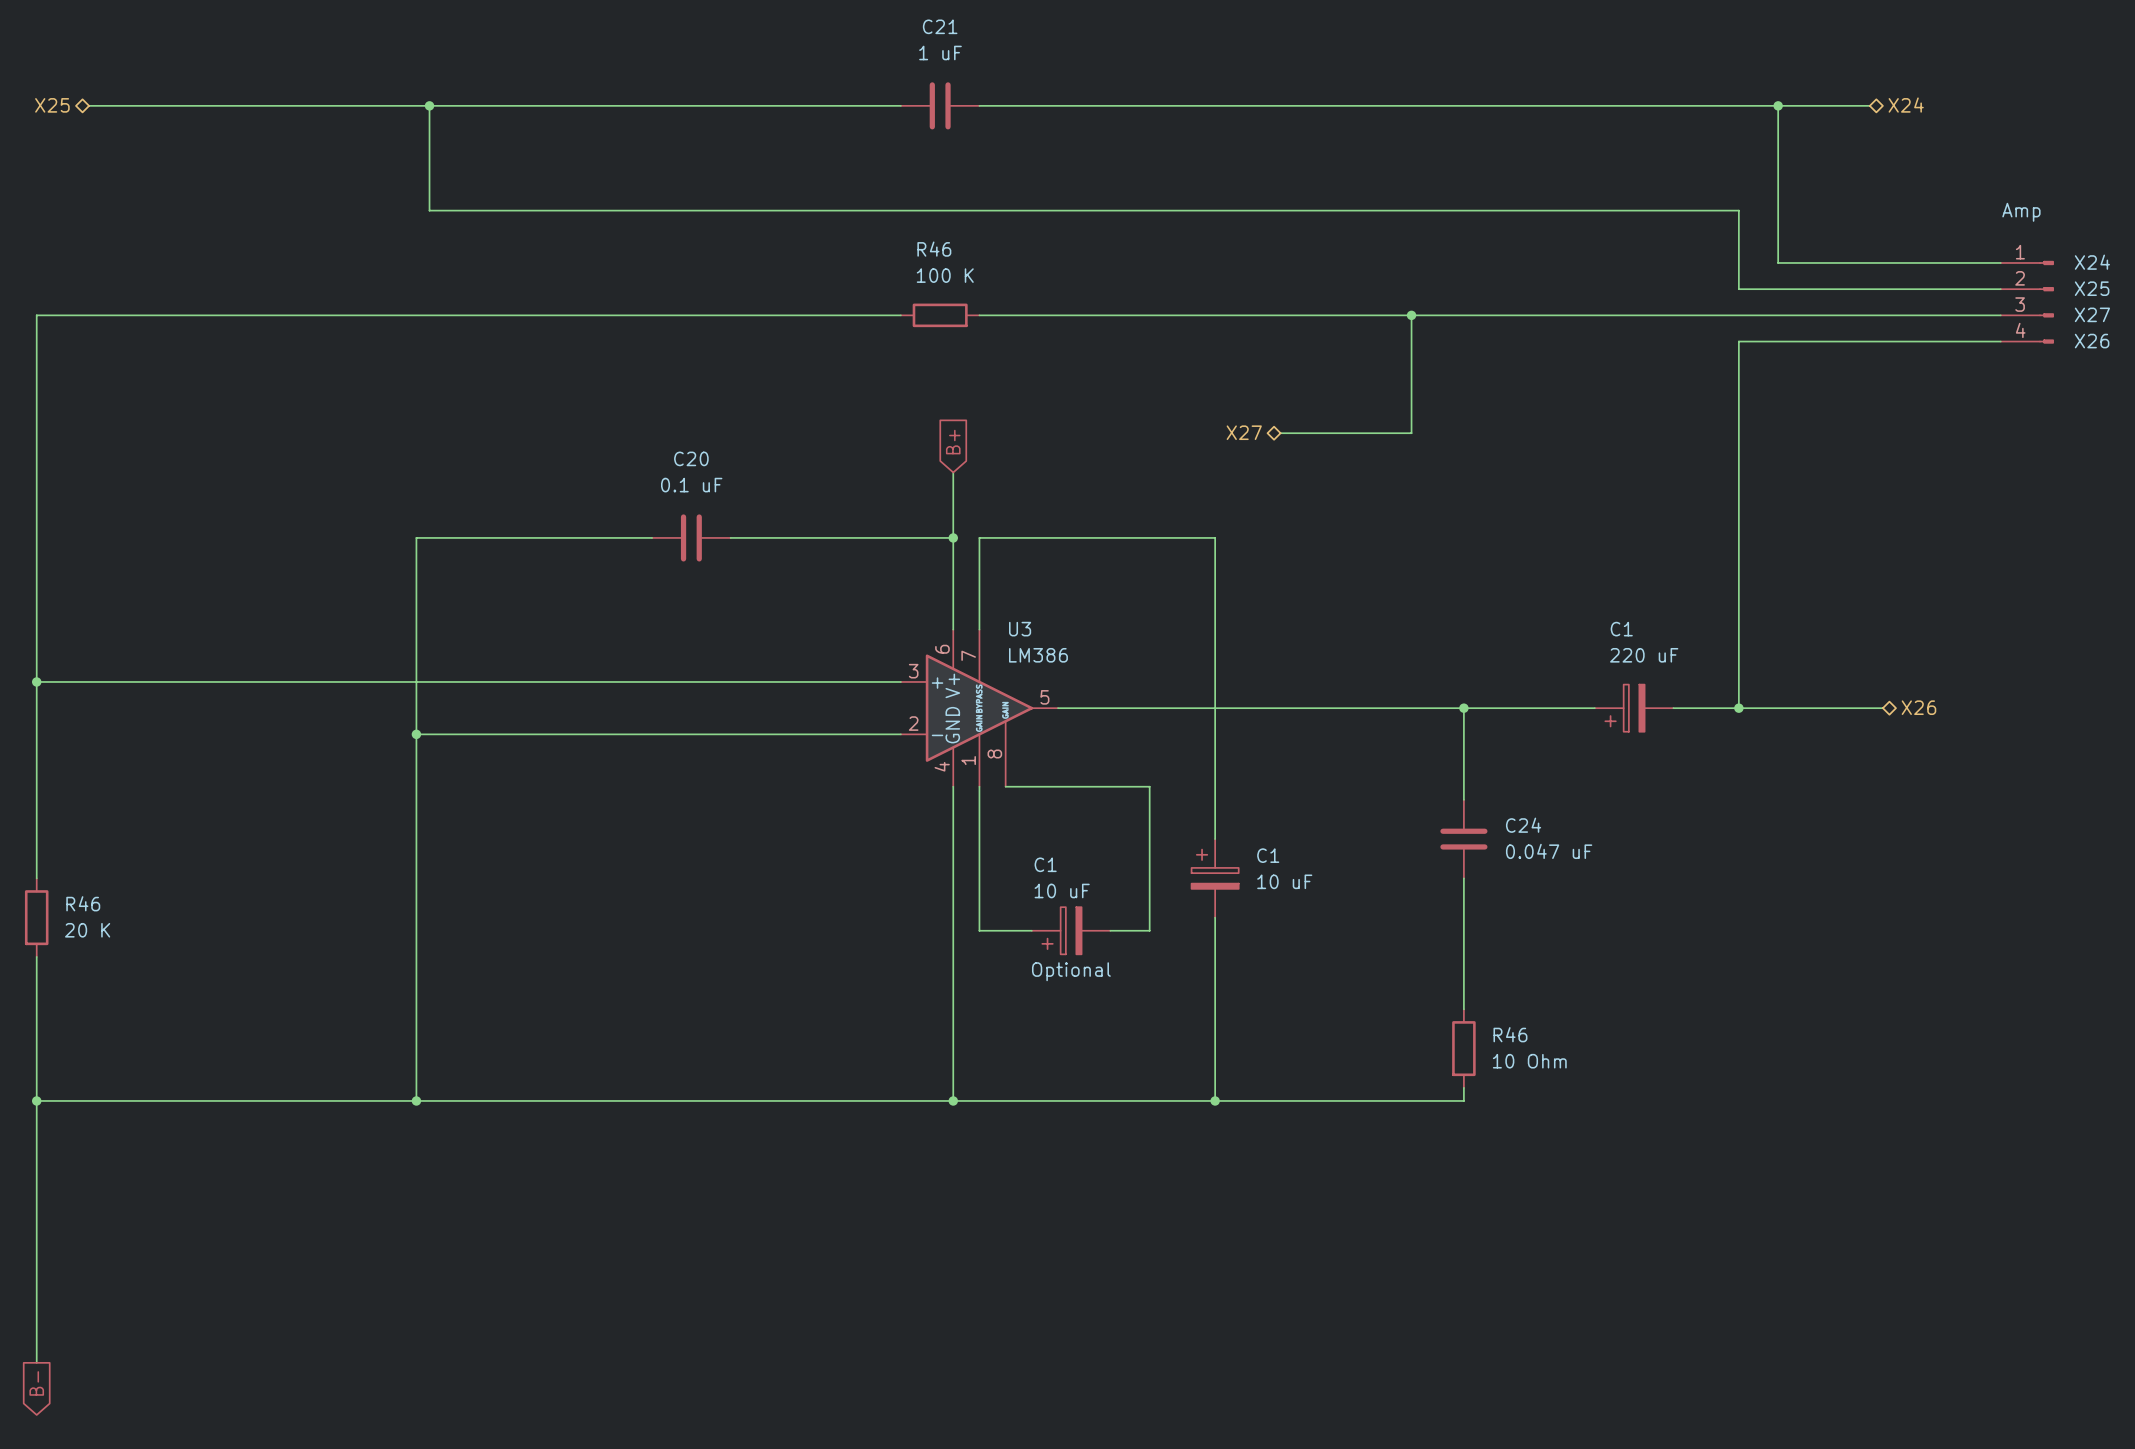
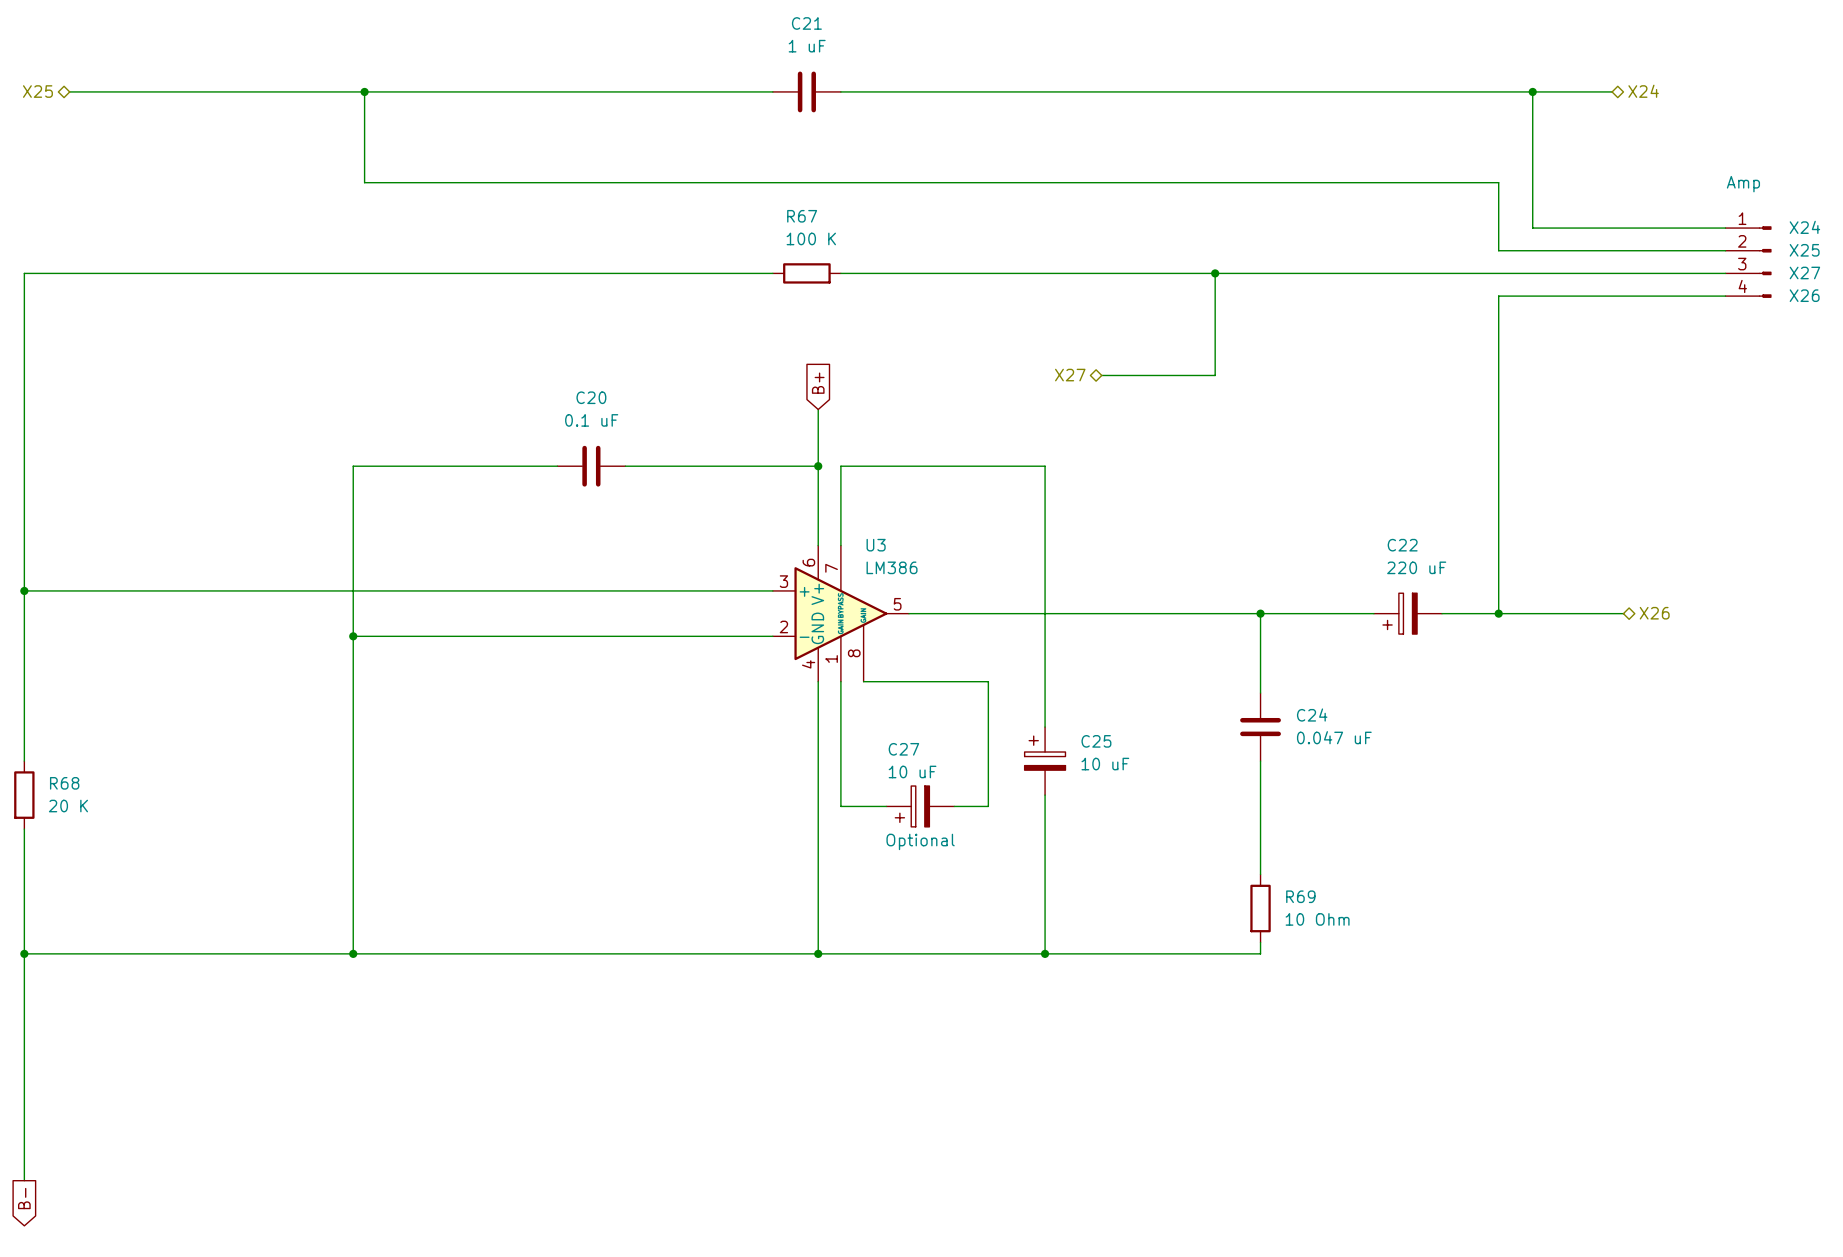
R46 name: R46 (934, 249) -> R67 (802, 216)
C1 name: C1 (1621, 629) -> C22 (1402, 545)
C1 name: C1 (1268, 855) -> C25 (1096, 741)
C1 name: C1 (1045, 864) -> C27 (903, 749)
R46 name: R46 (83, 903) -> R68 (64, 783)
R46 name: R46 (1510, 1034) -> R69 (1300, 896)

